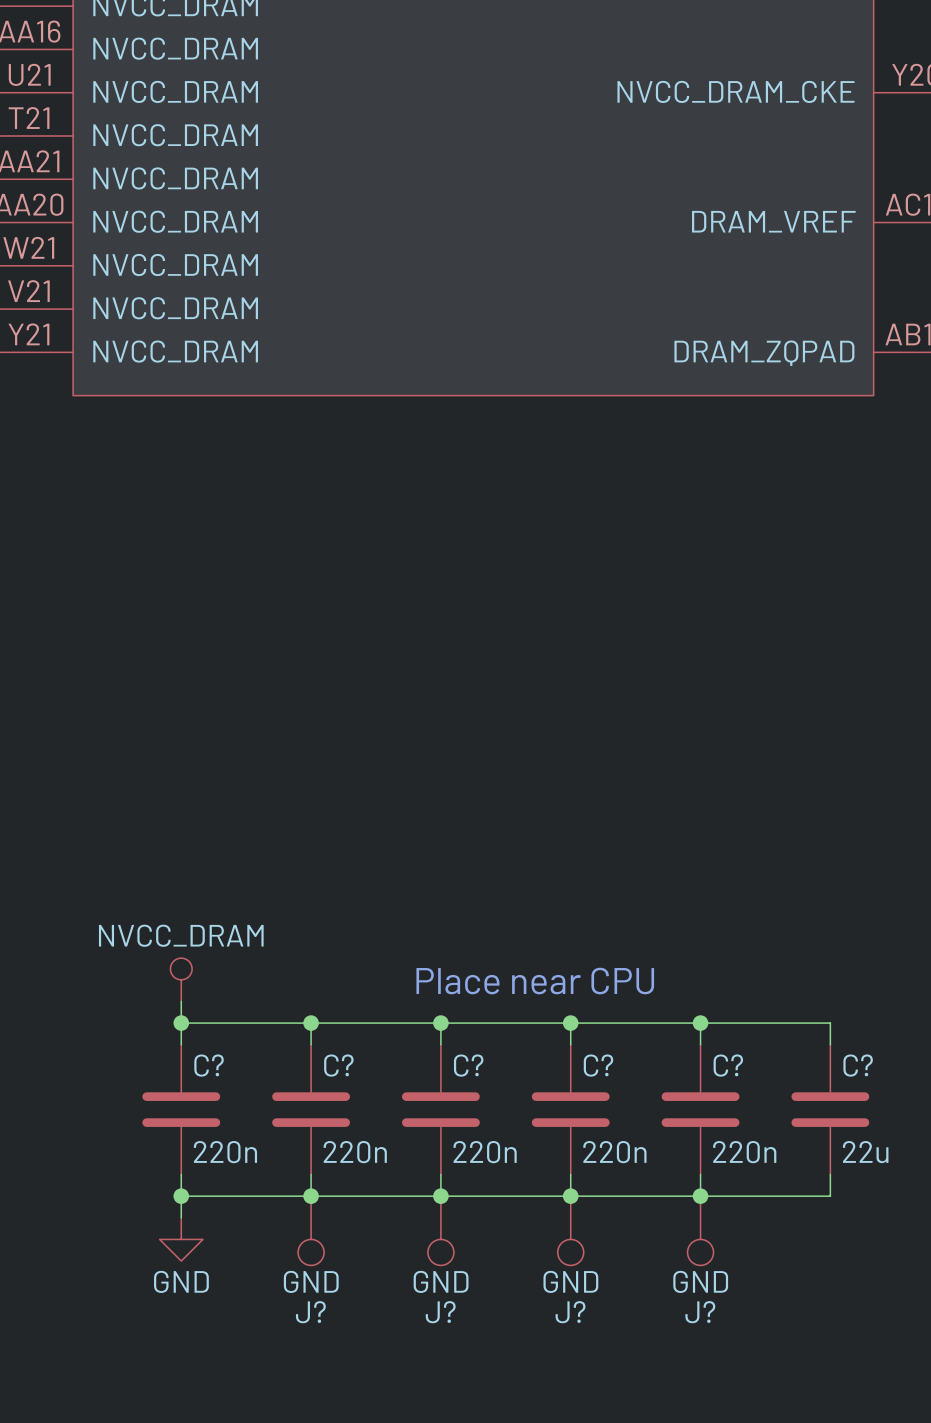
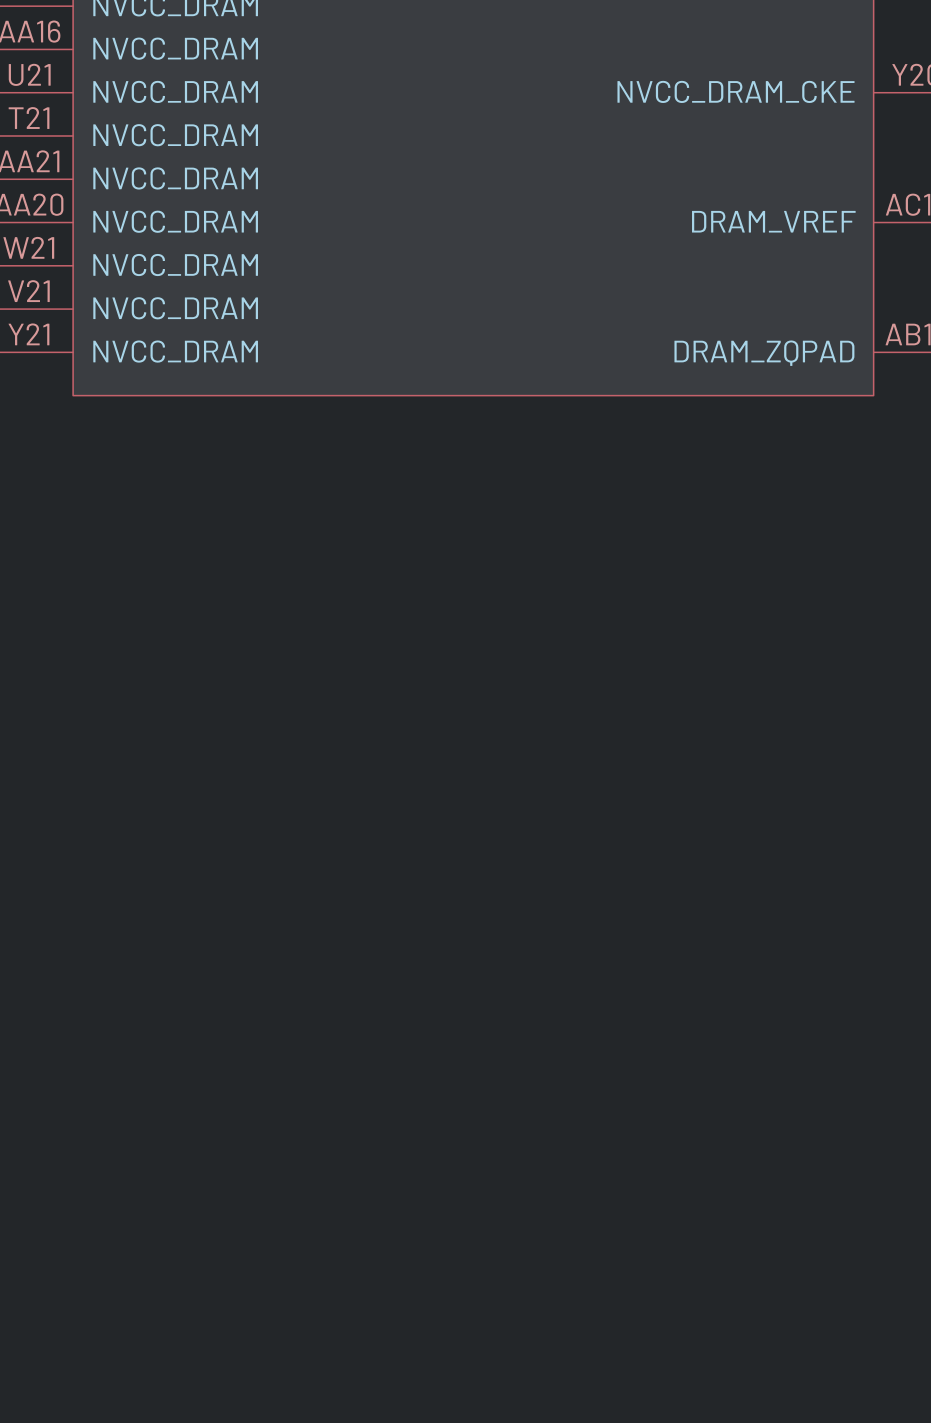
power symbol: NVCC_DRAM (181, 979) -> none
text: Place near CPU (535, 981) -> none
wire: (181, 1001) (181, 1044) -> none
wire: (181, 1023) (830, 1023) (830, 1044) -> none
junction: (181, 1023) -> none
wire: (311, 1023) (311, 1044) -> none
junction: (311, 1023) -> none
wire: (440, 1023) (440, 1044) -> none
junction: (440, 1023) -> none
wire: (570, 1023) (570, 1044) -> none
junction: (570, 1023) -> none
wire: (700, 1023) (700, 1044) -> none
junction: (700, 1023) -> none
C?: 220n (181, 1109) -> none
C?: 220n (311, 1109) -> none
C?: 220n (440, 1109) -> none
C?: 220n (570, 1109) -> none
C?: 220n (700, 1109) -> none
C?: 22u (830, 1109) -> none
wire: (181, 1174) (181, 1217) -> none
wire: (311, 1174) (311, 1196) -> none
wire: (440, 1174) (440, 1196) -> none
wire: (570, 1174) (570, 1196) -> none
wire: (700, 1174) (700, 1196) -> none
wire: (830, 1174) (830, 1196) (181, 1196) -> none
junction: (181, 1196) -> none
junction: (311, 1196) -> none
junction: (440, 1196) -> none
junction: (570, 1196) -> none
junction: (700, 1196) -> none
J?: GND (311, 1230) -> none
J?: GND (440, 1230) -> none
J?: GND (570, 1230) -> none
J?: GND (700, 1230) -> none
power symbol: GND (181, 1239) -> none

